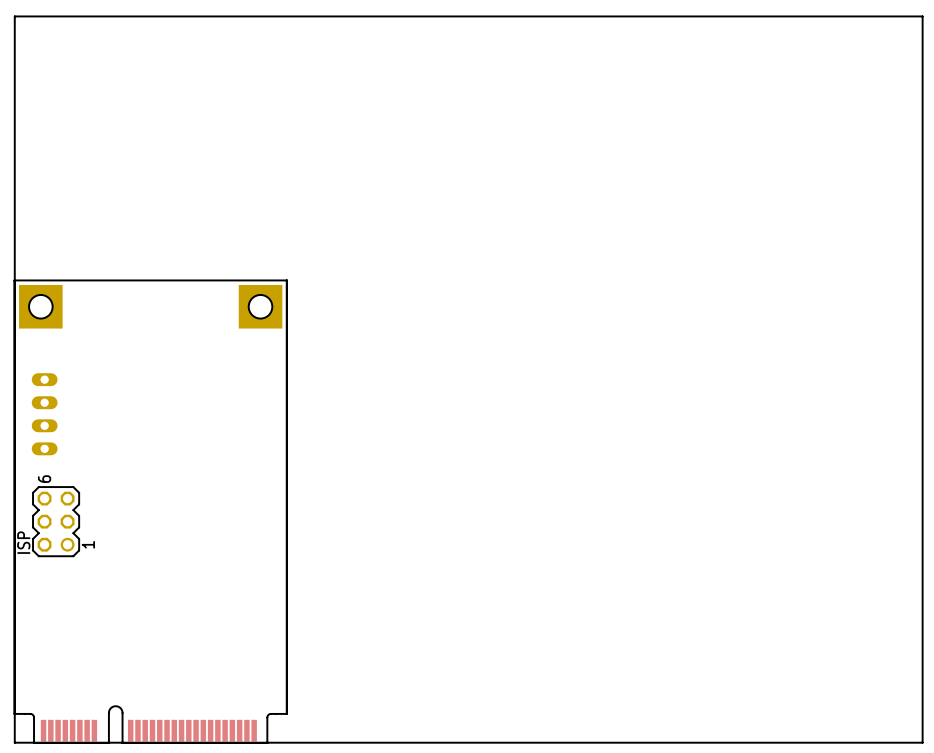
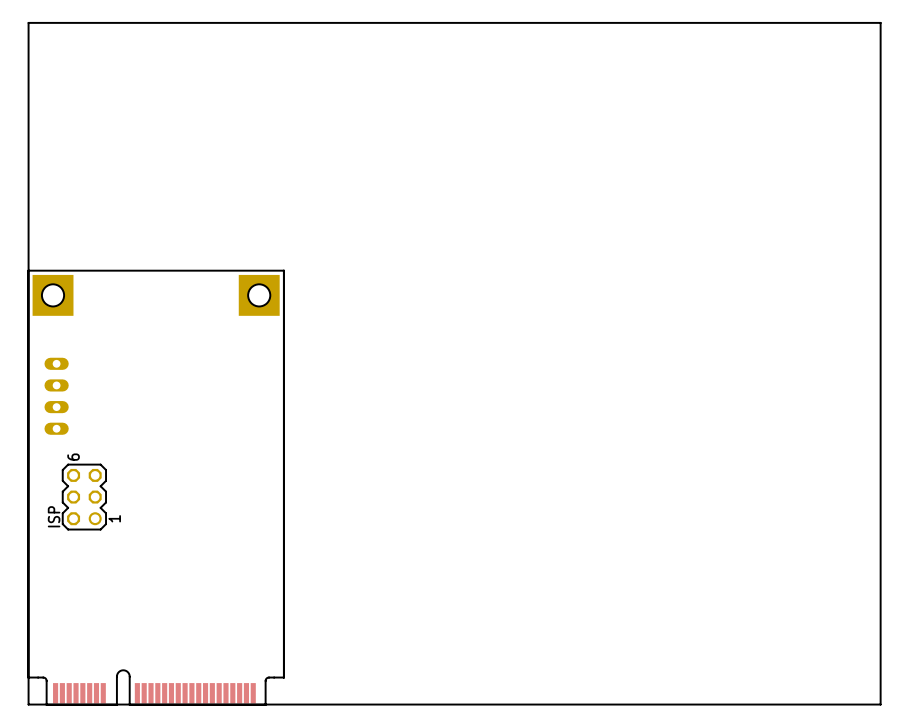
ISP position: (56, 521) -> (84, 497)

